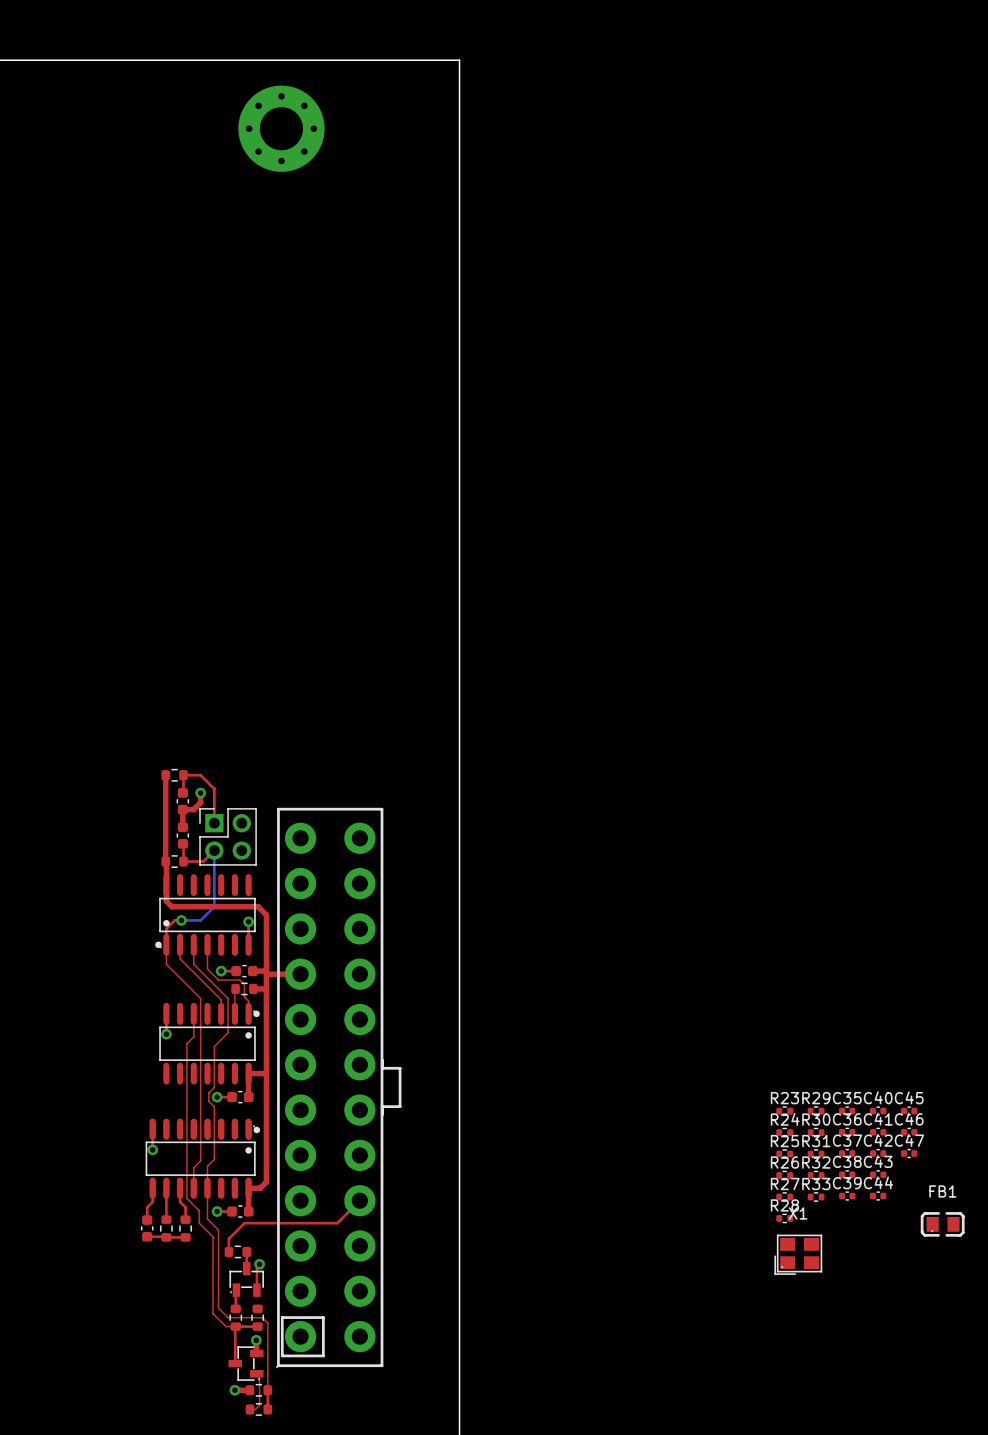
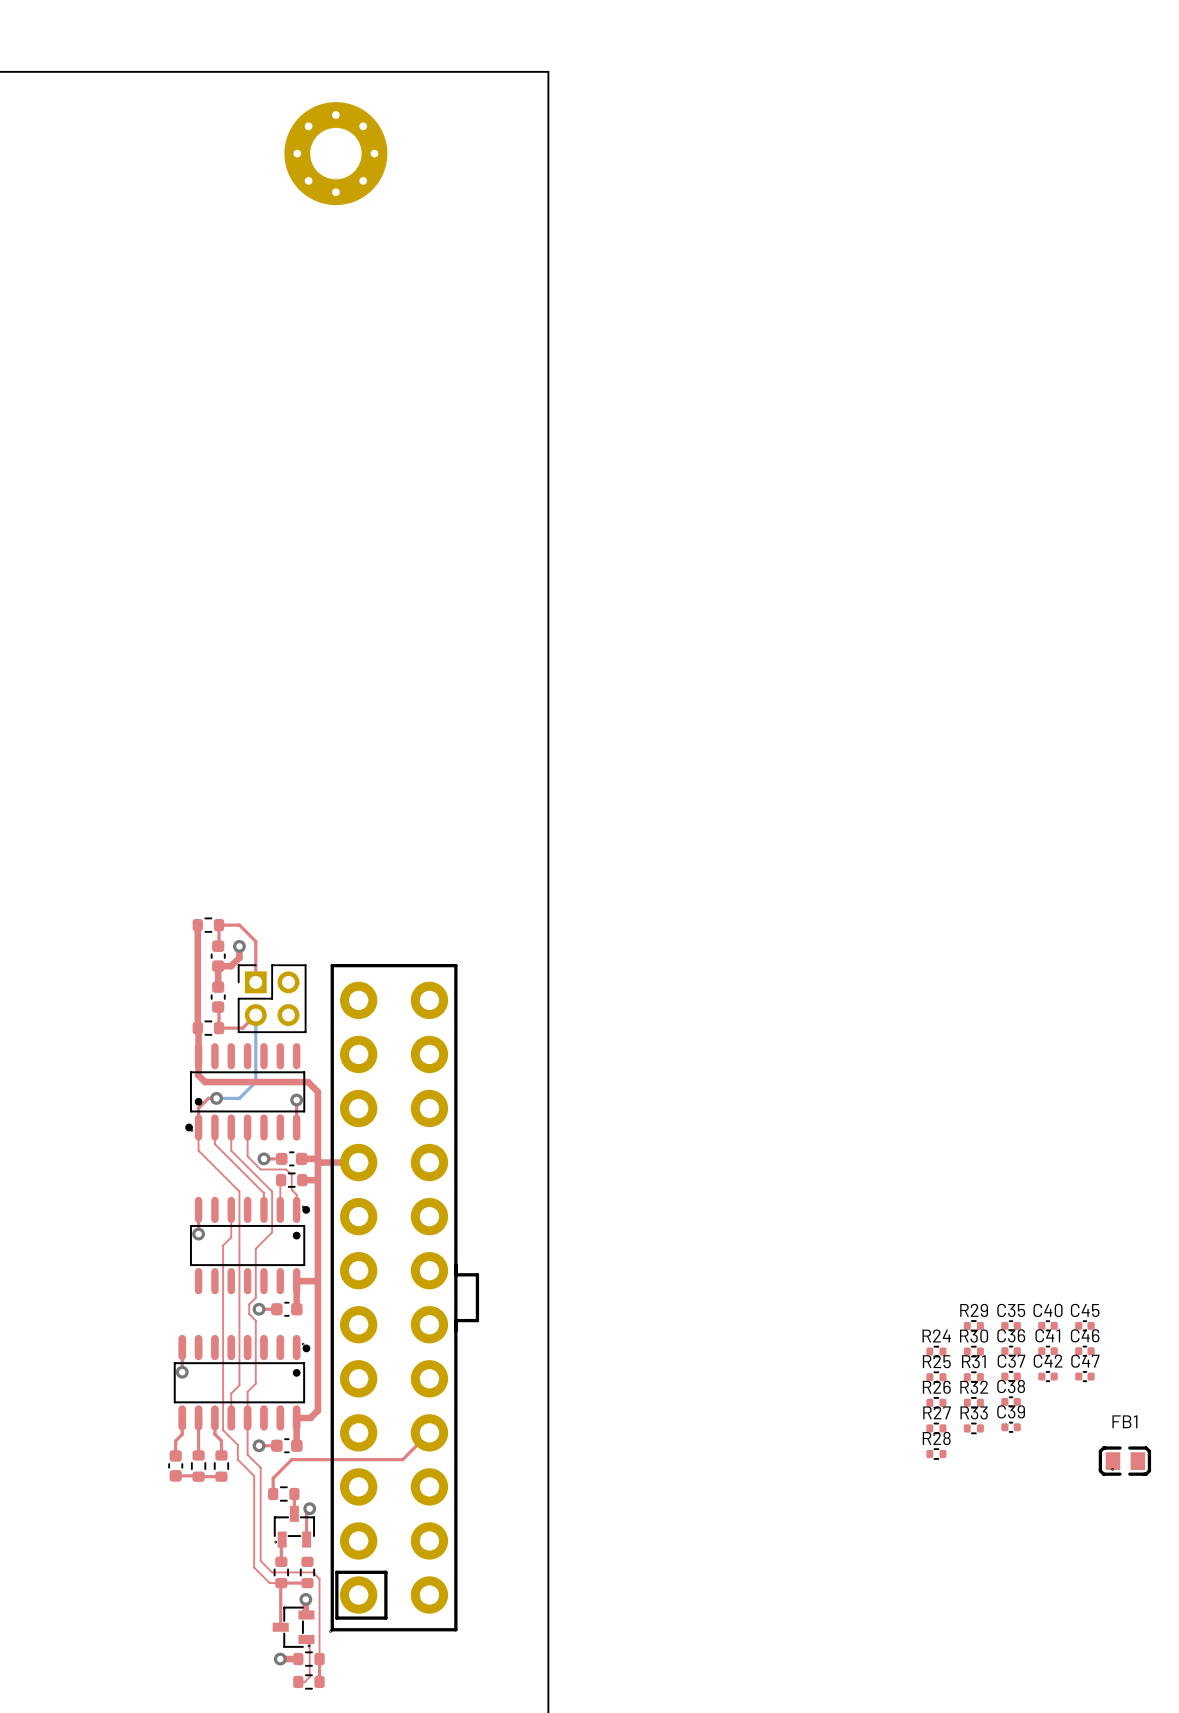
R23: (784, 1111) -> none
C43: (878, 1174) -> none
C44: (878, 1196) -> none
X1: (798, 1254) -> none

